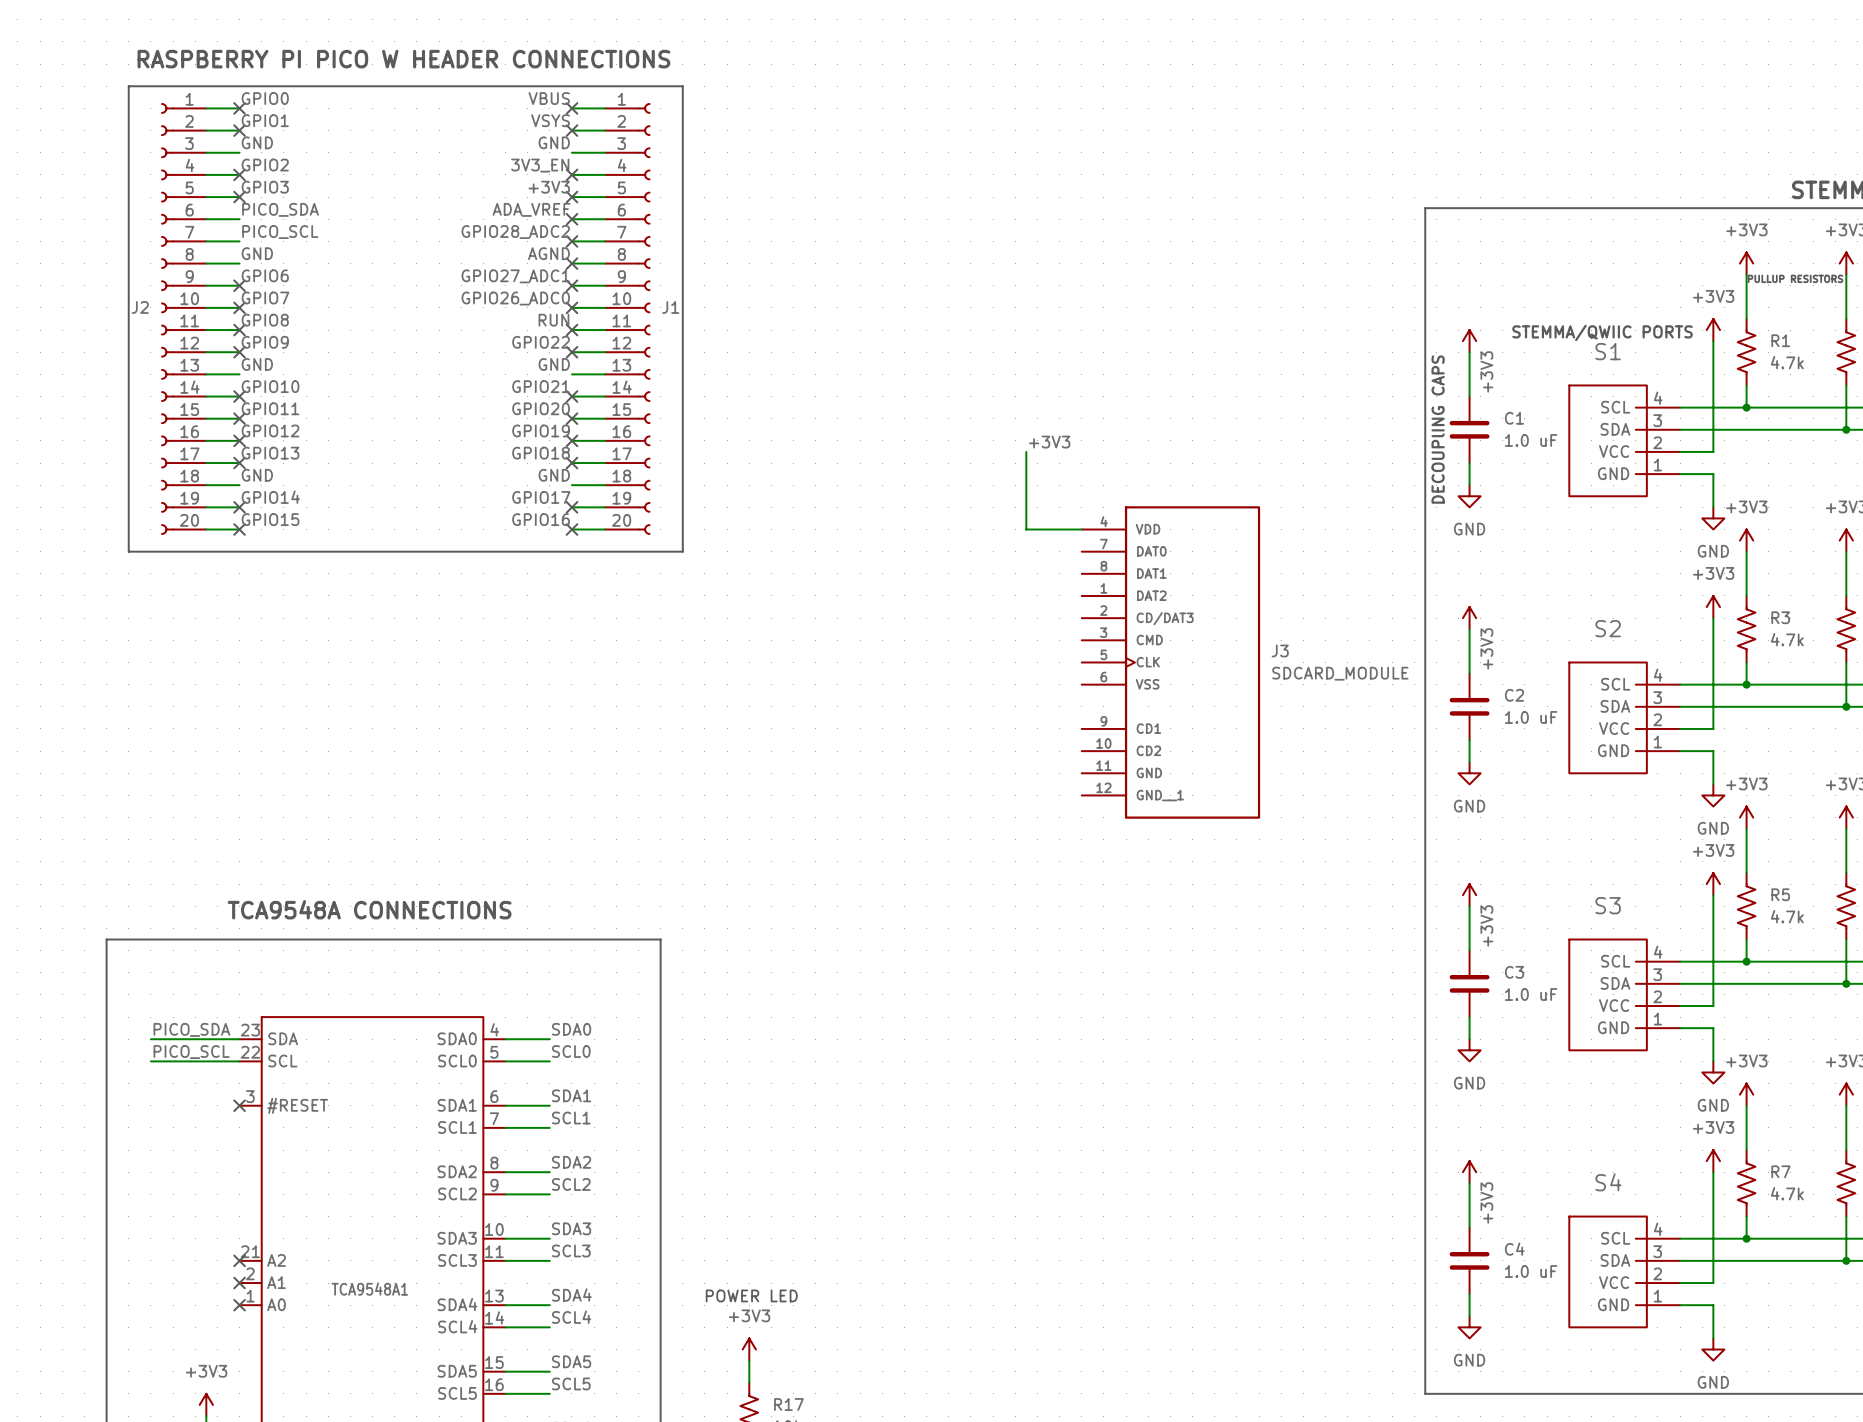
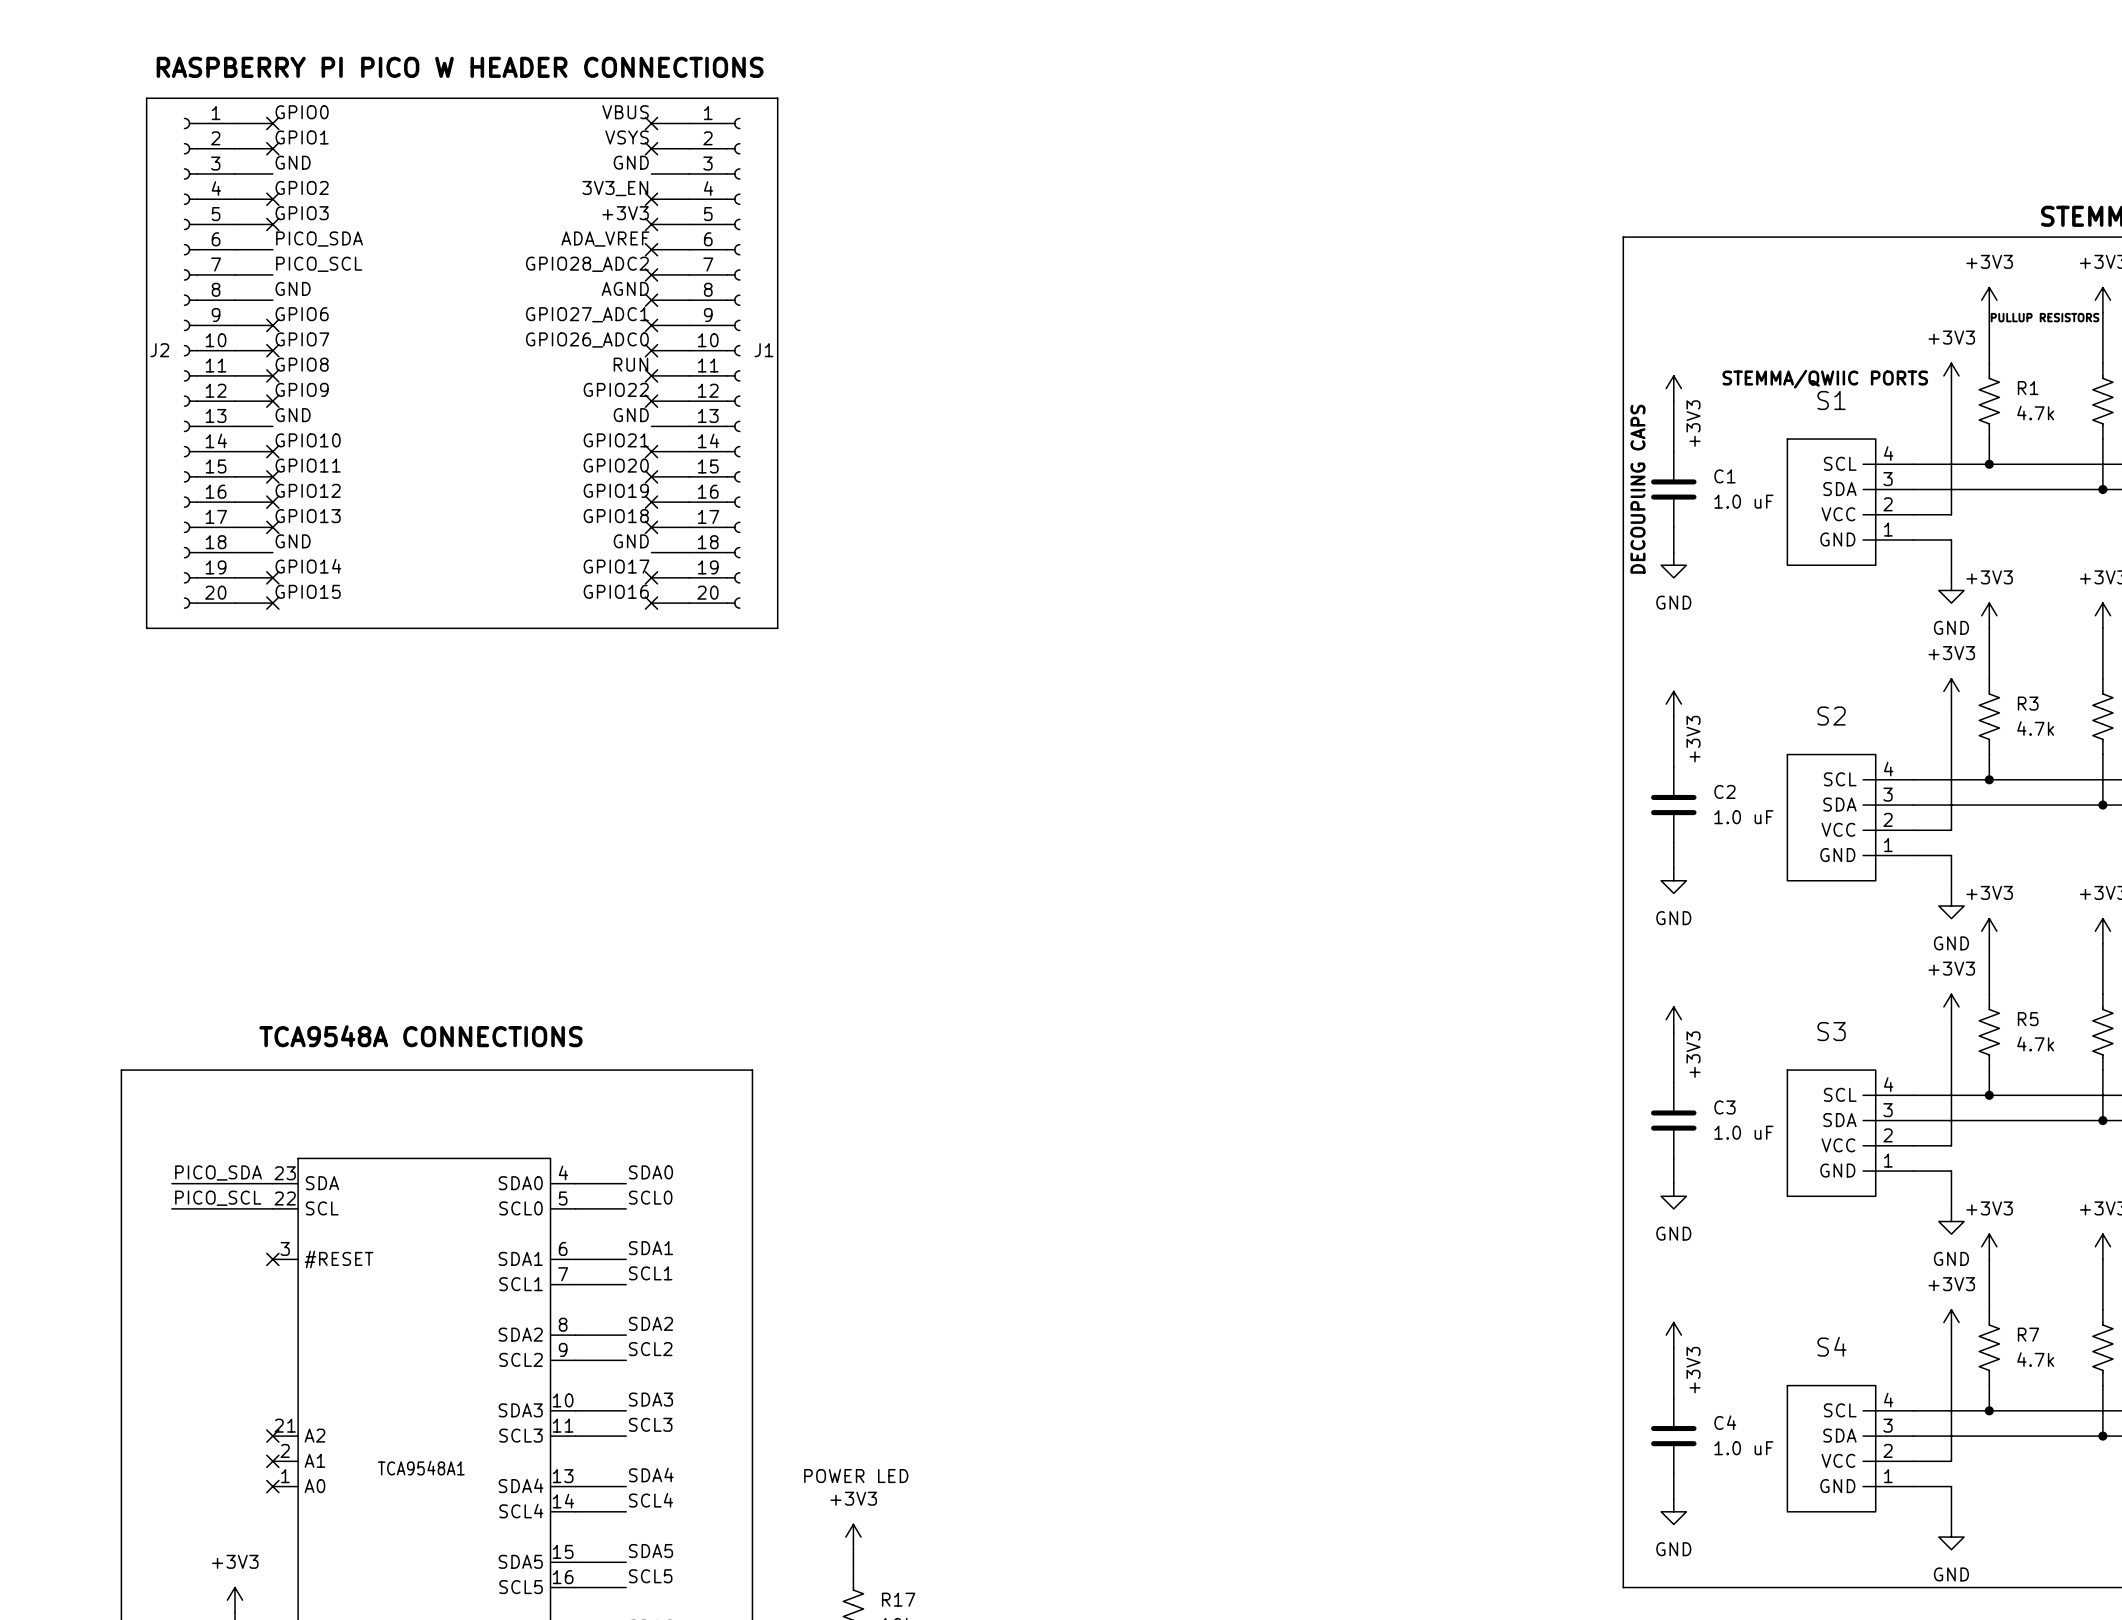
label: +3V3 (1049, 442) -> none
wire: (1026, 451) (1026, 529) (1081, 529) -> none
J3: SDCARD_MODULE (1170, 662) -> none

